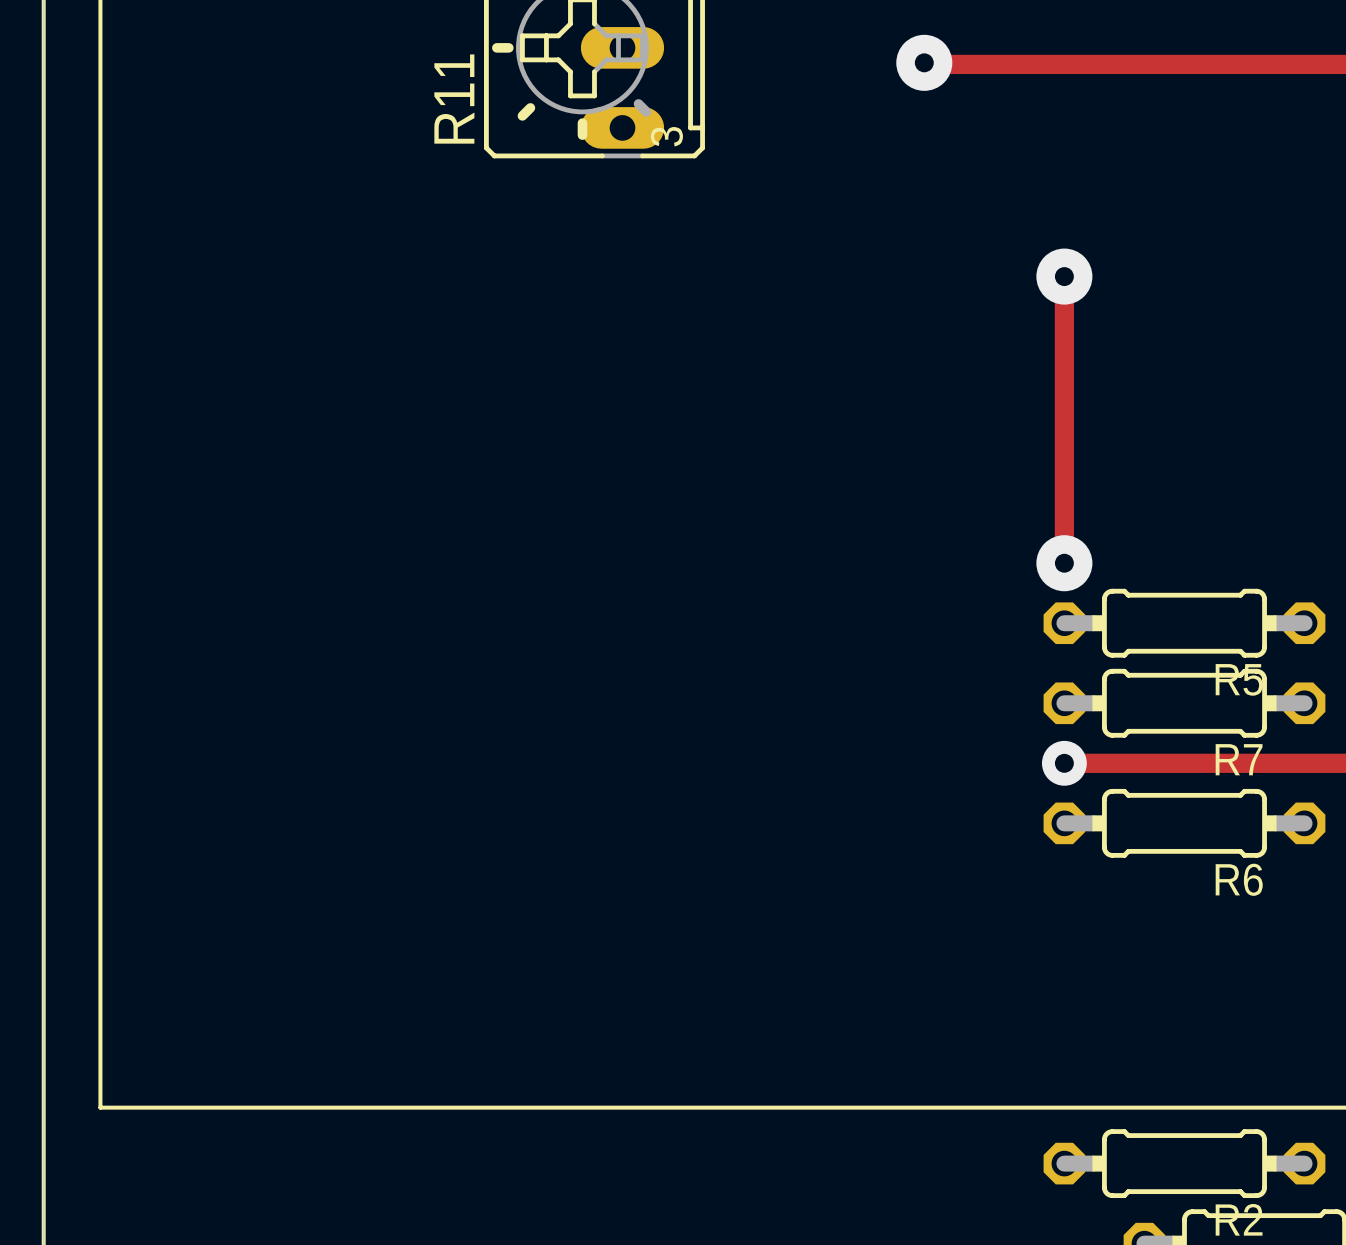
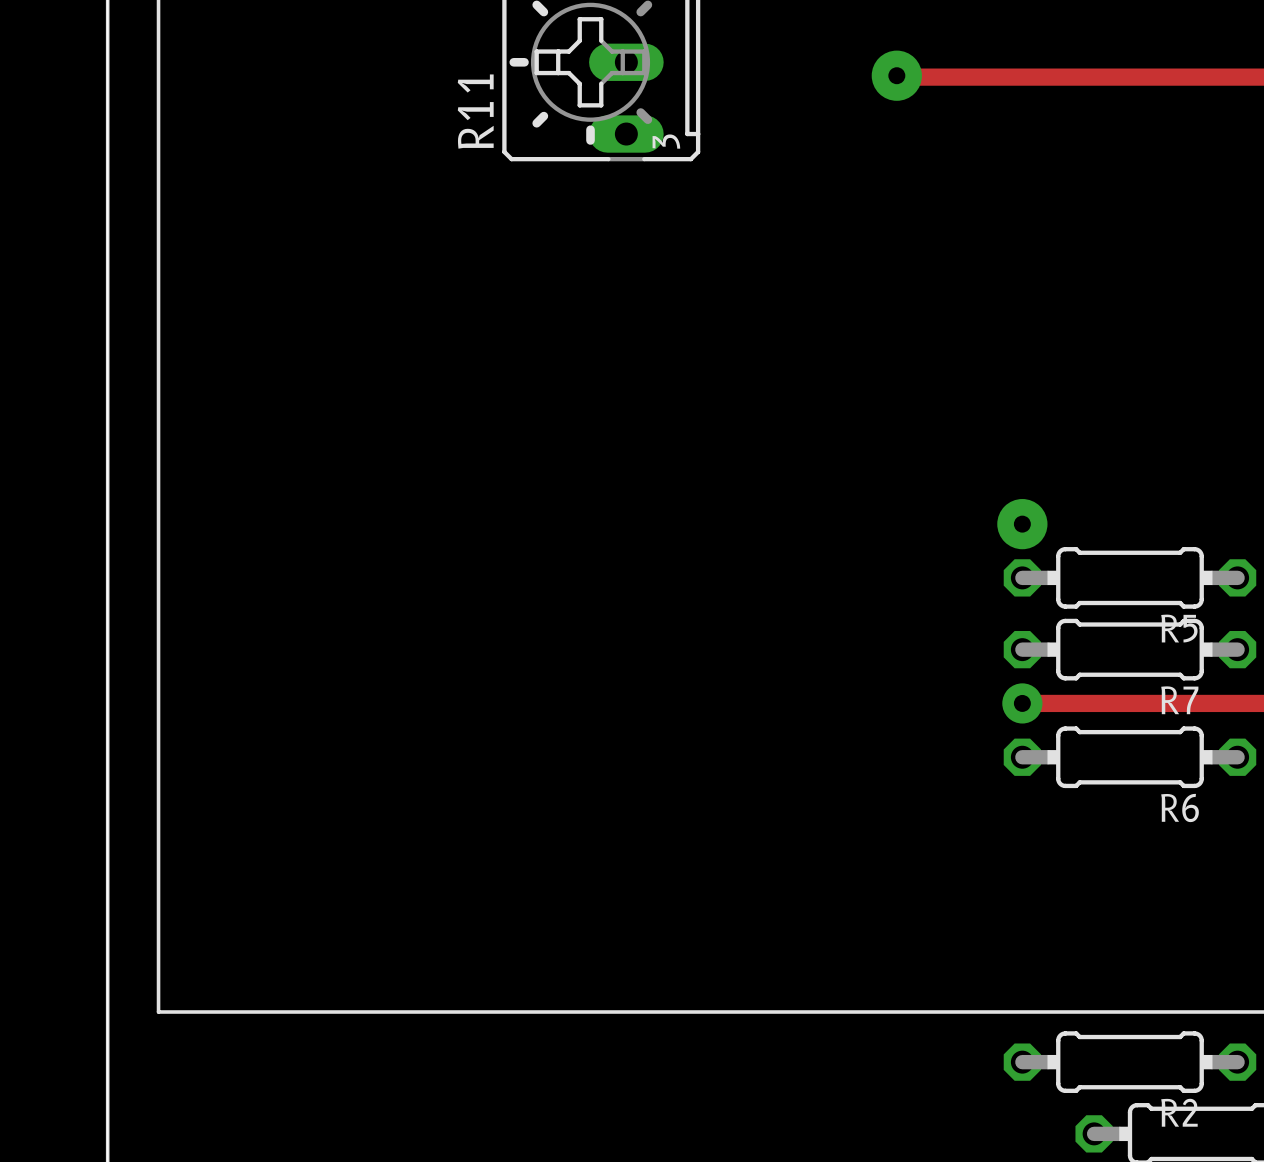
track: (1064, 276) (1064, 563) -> none
via: (1064, 276) -> none

